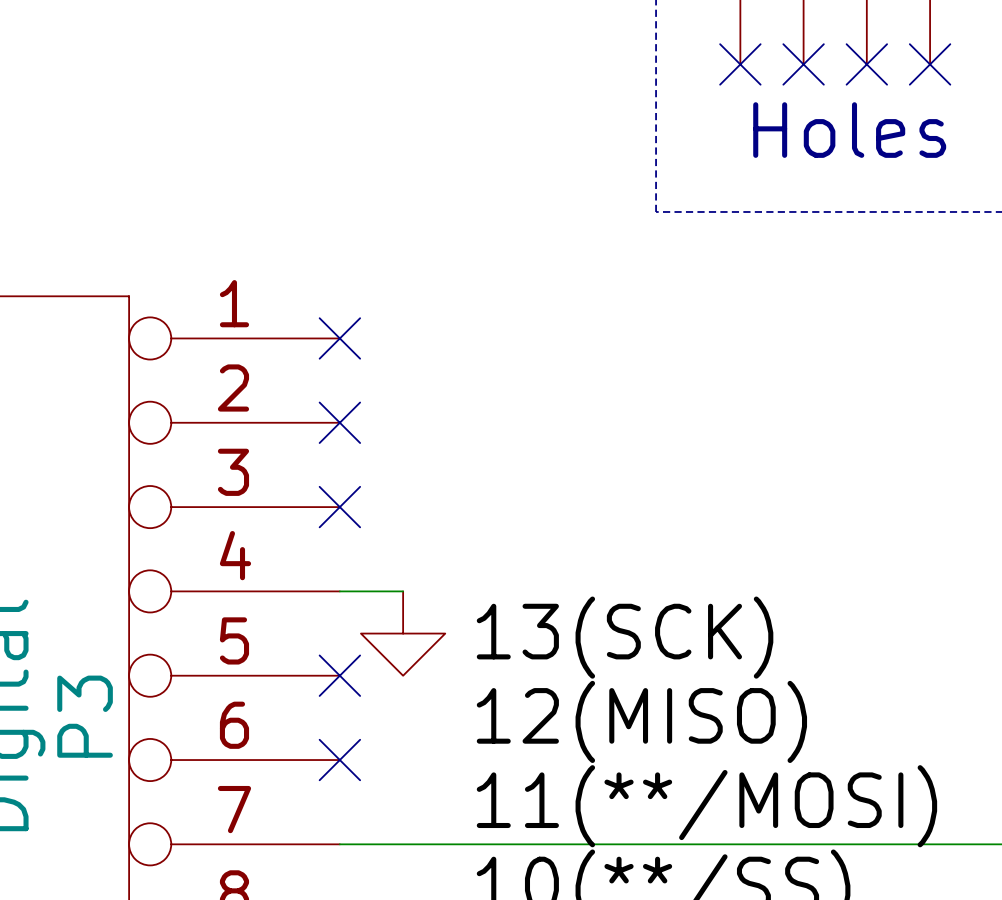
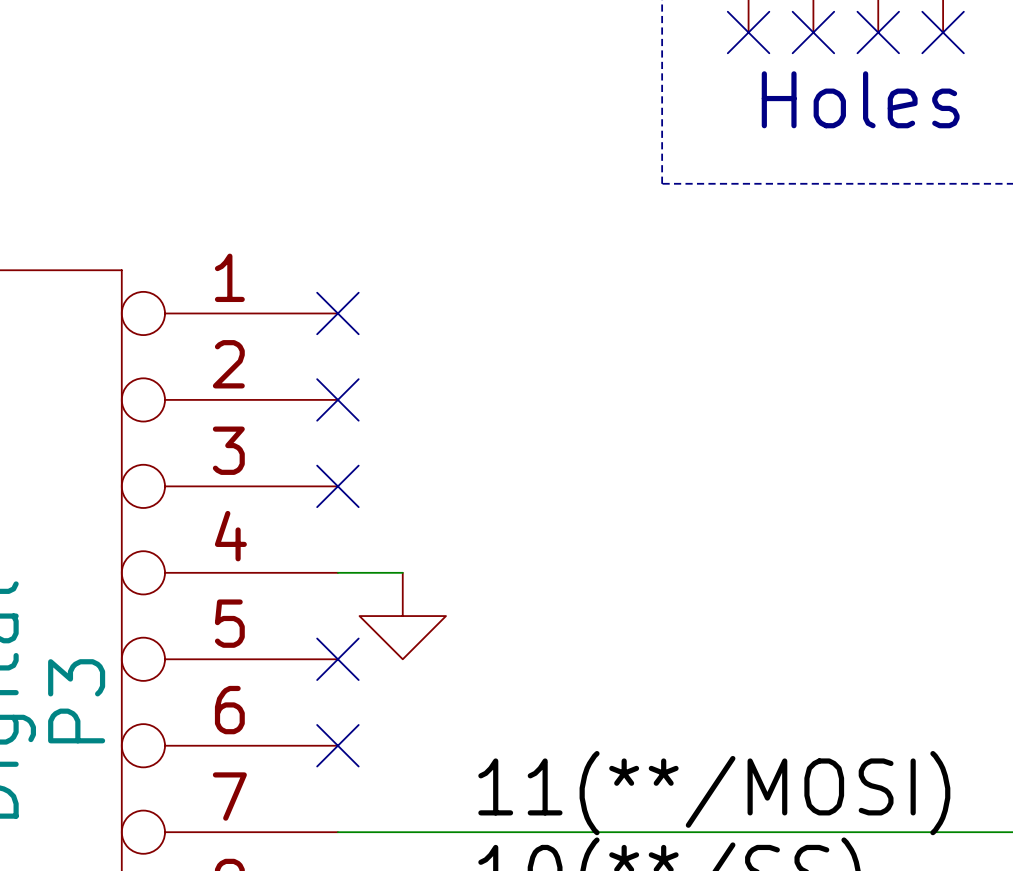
label: 13(SCK) (625, 637) -> none
label: 12(MISO) (641, 721) -> none

